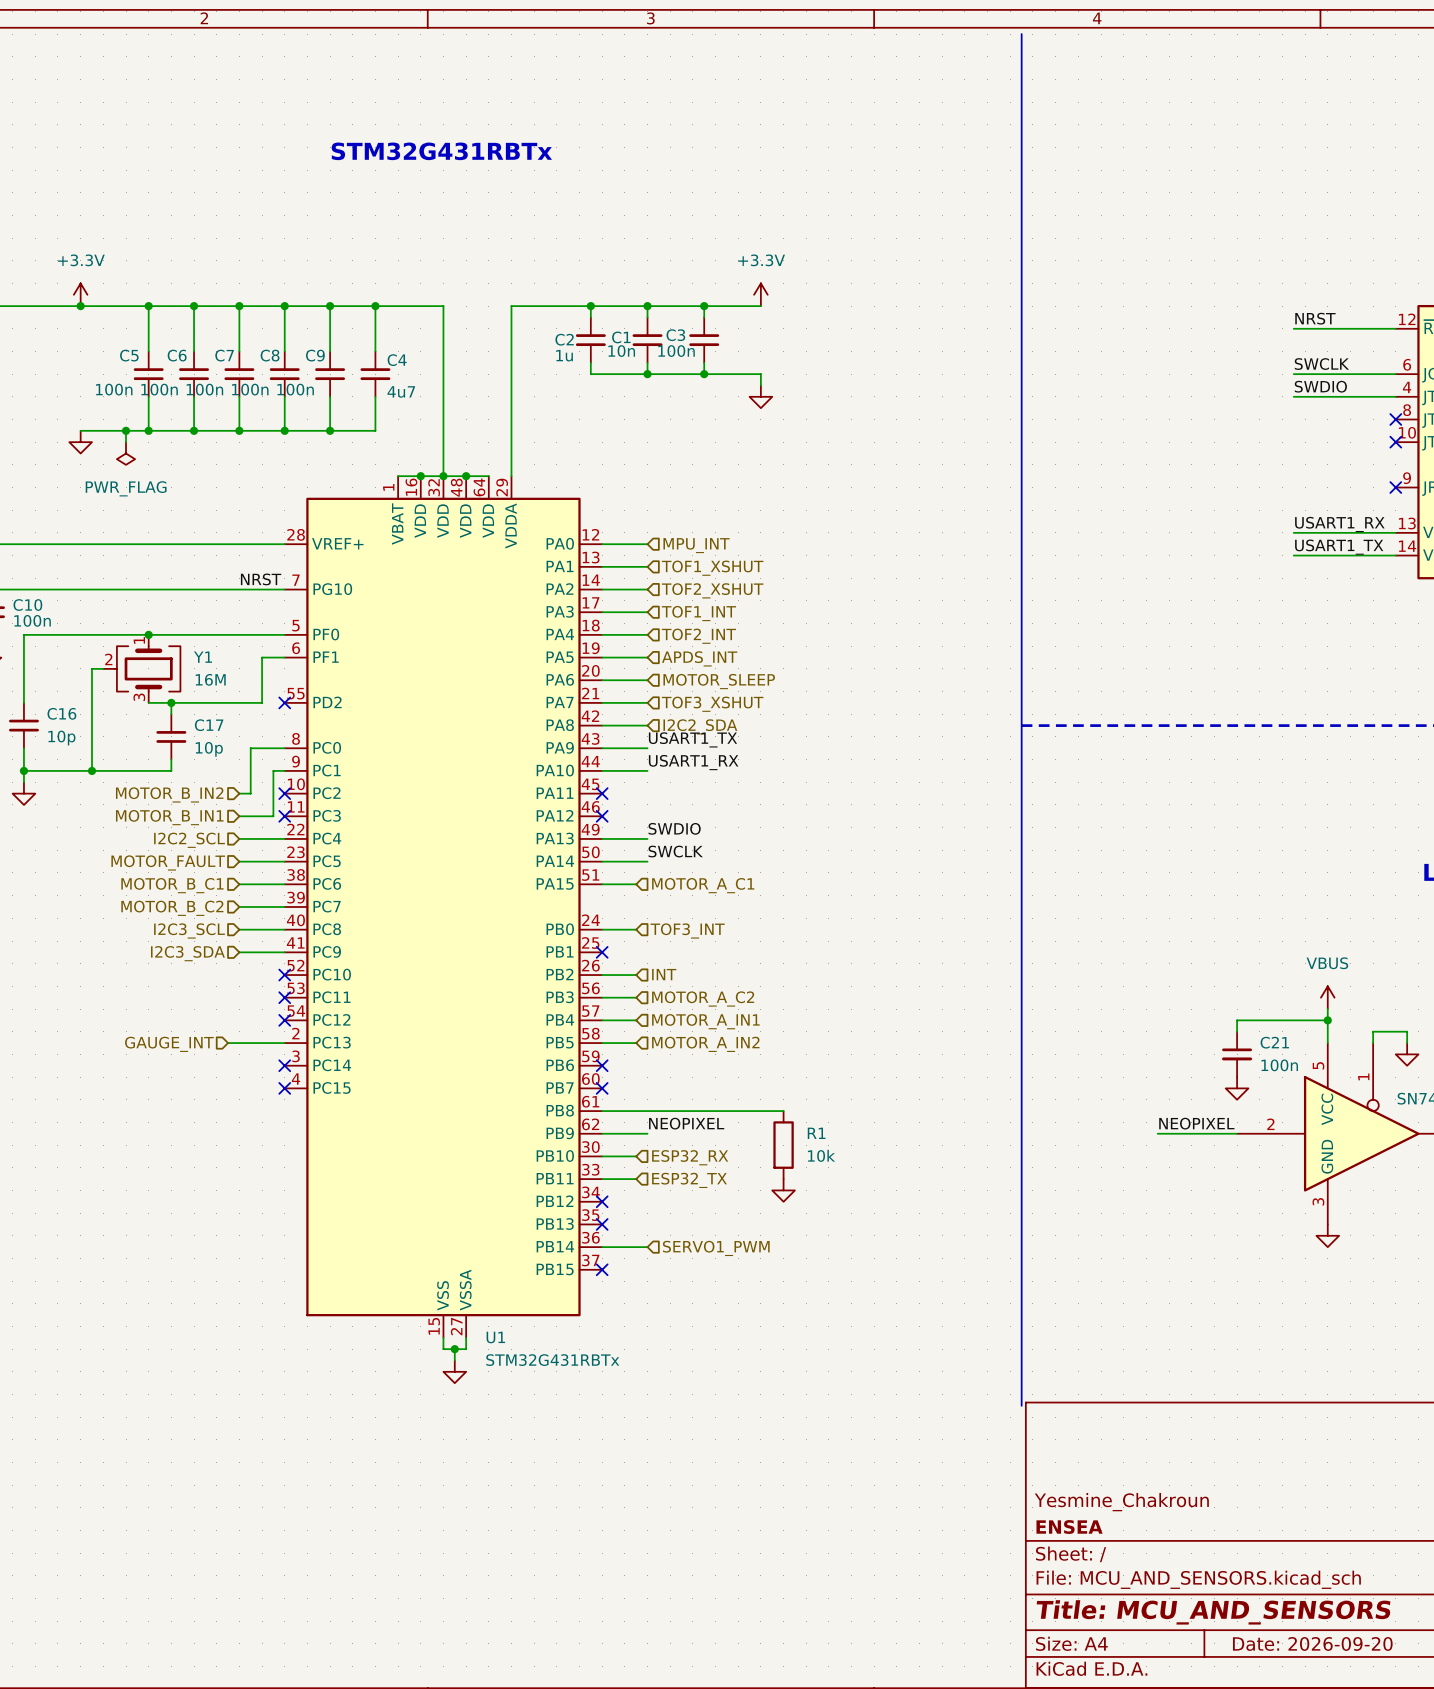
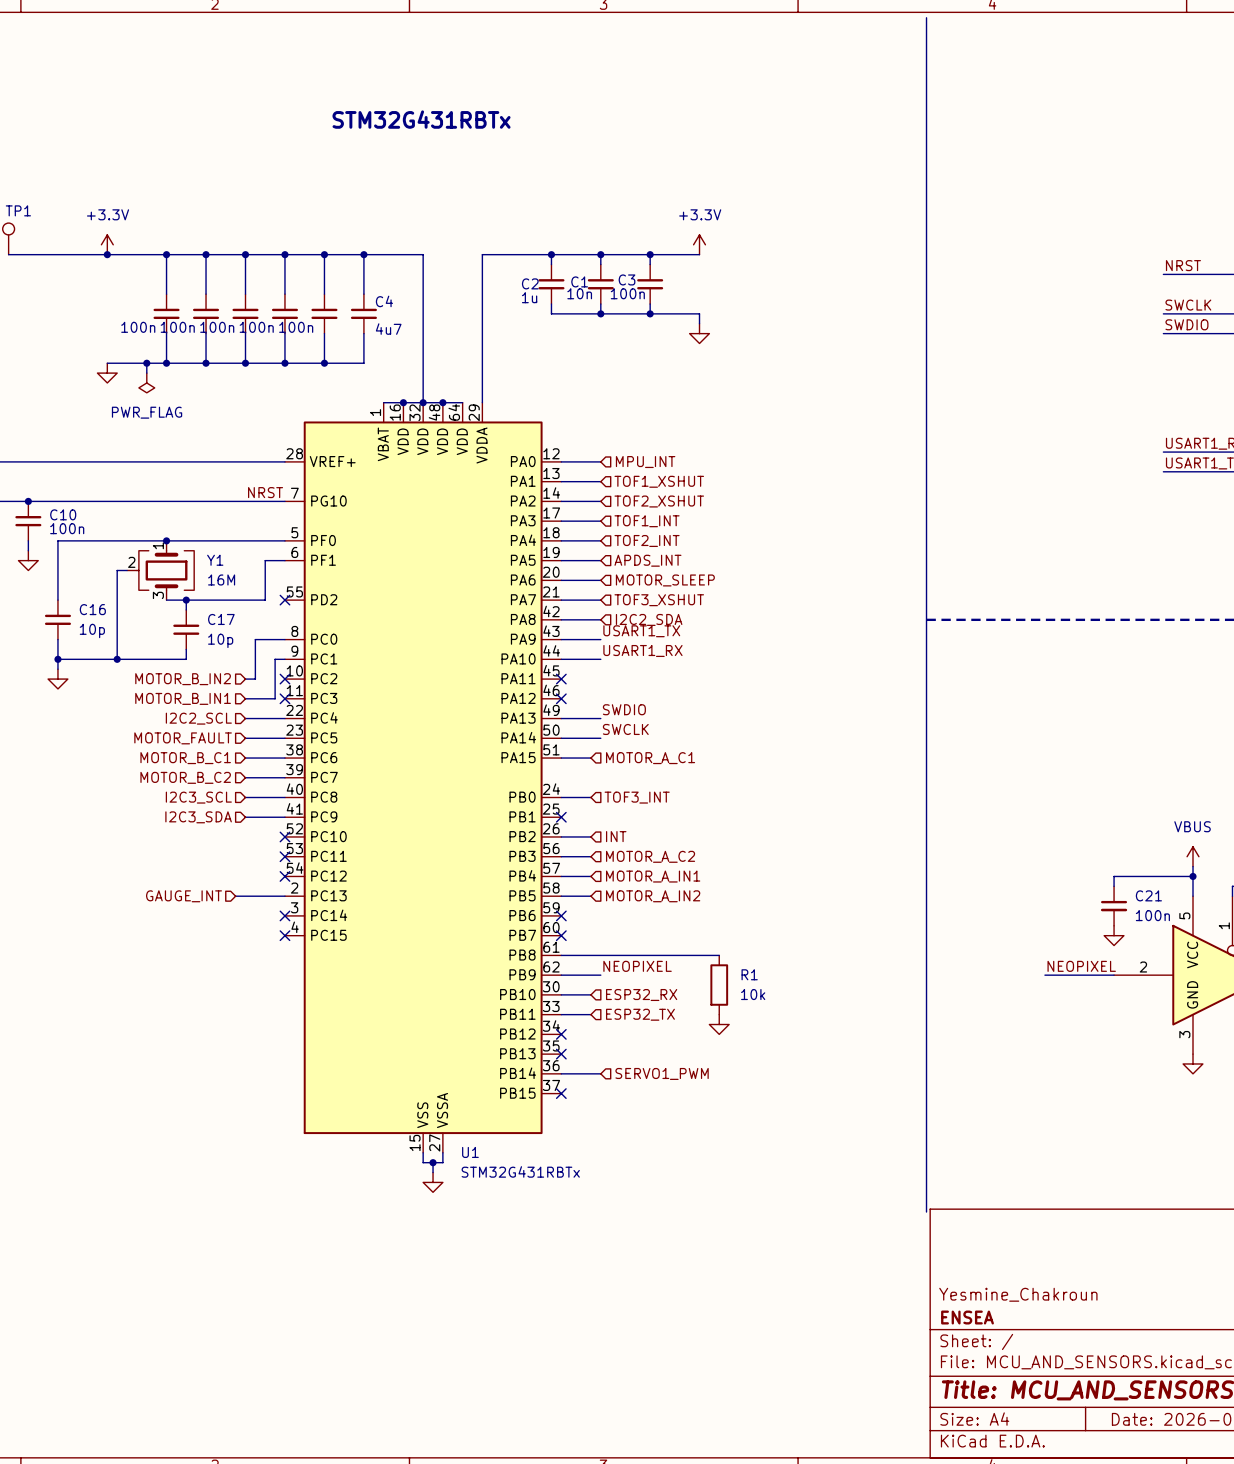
C5 name: C5 (129, 355) -> none
C6 name: C6 (177, 355) -> none
C7 name: C7 (224, 355) -> none
C8 name: C8 (270, 355) -> none
C9 name: C9 (315, 355) -> none

